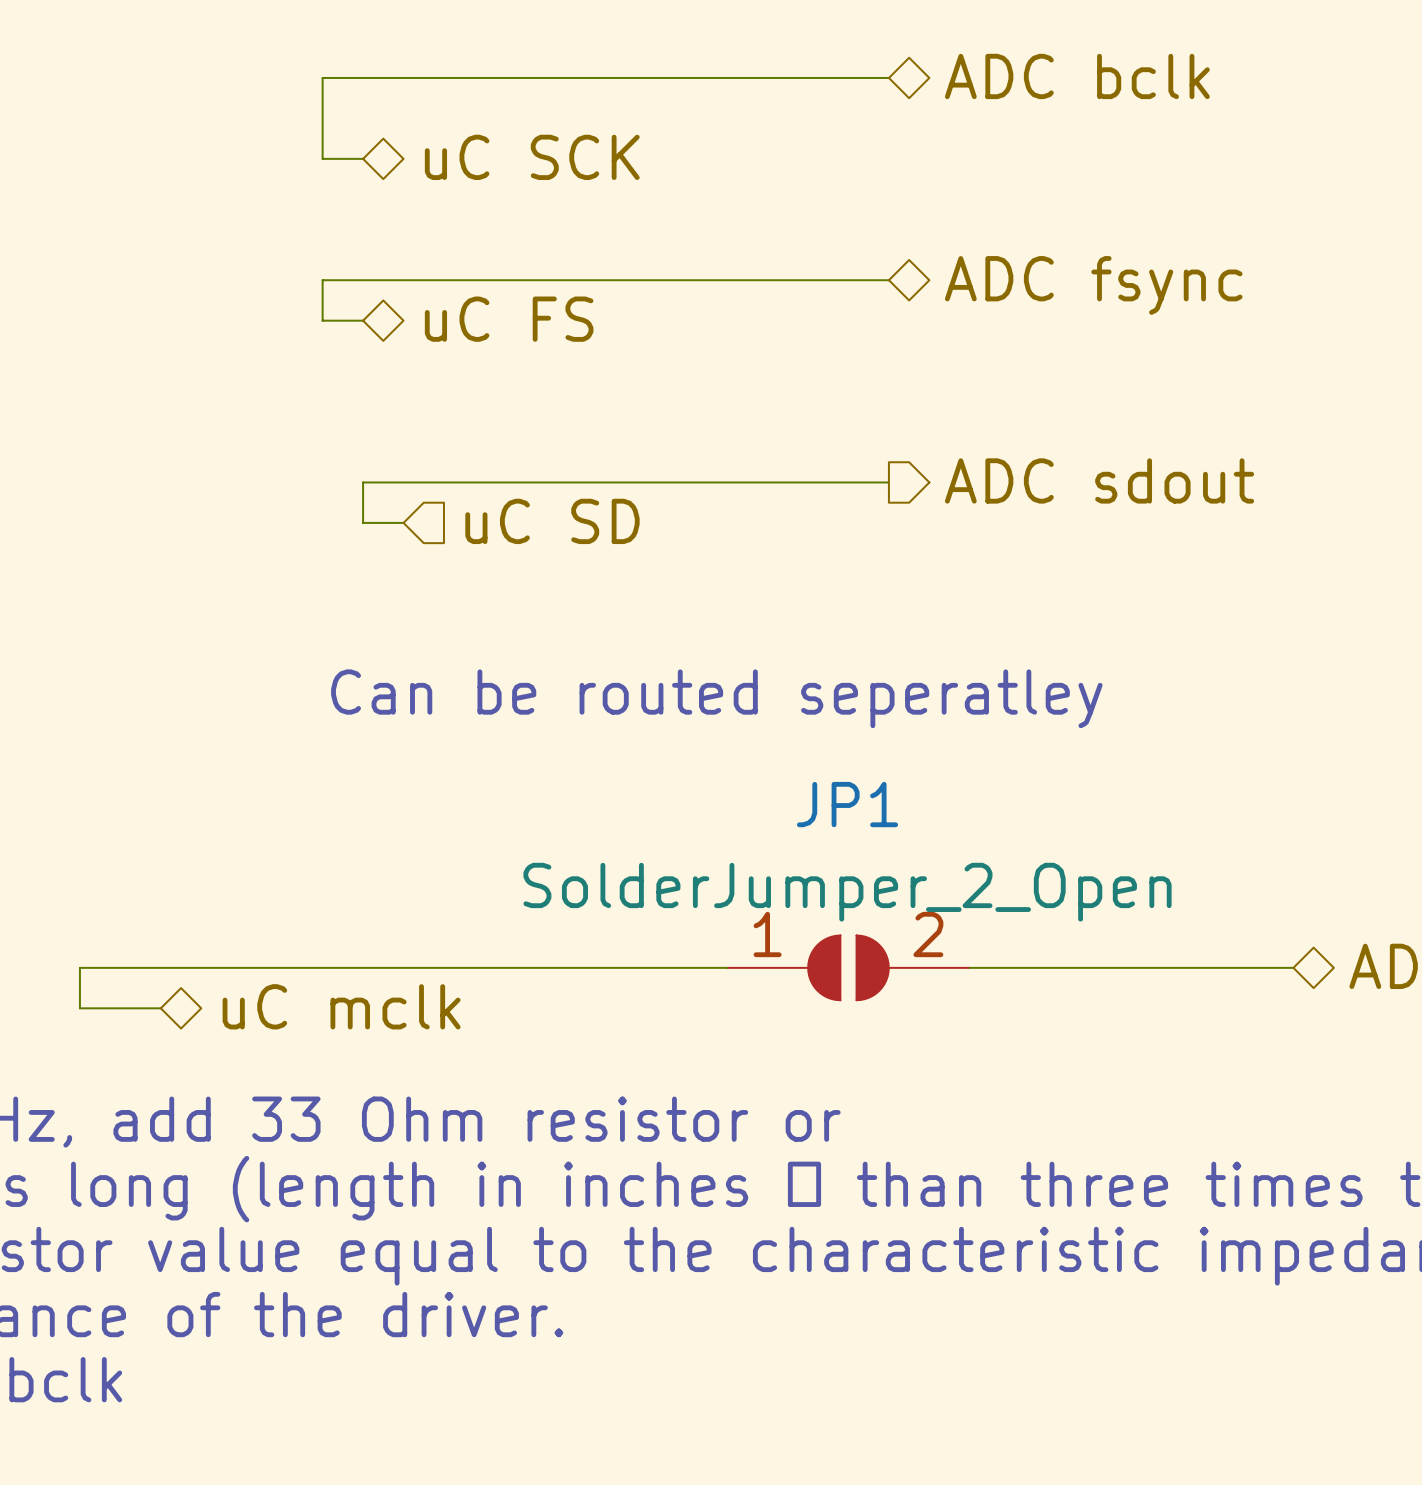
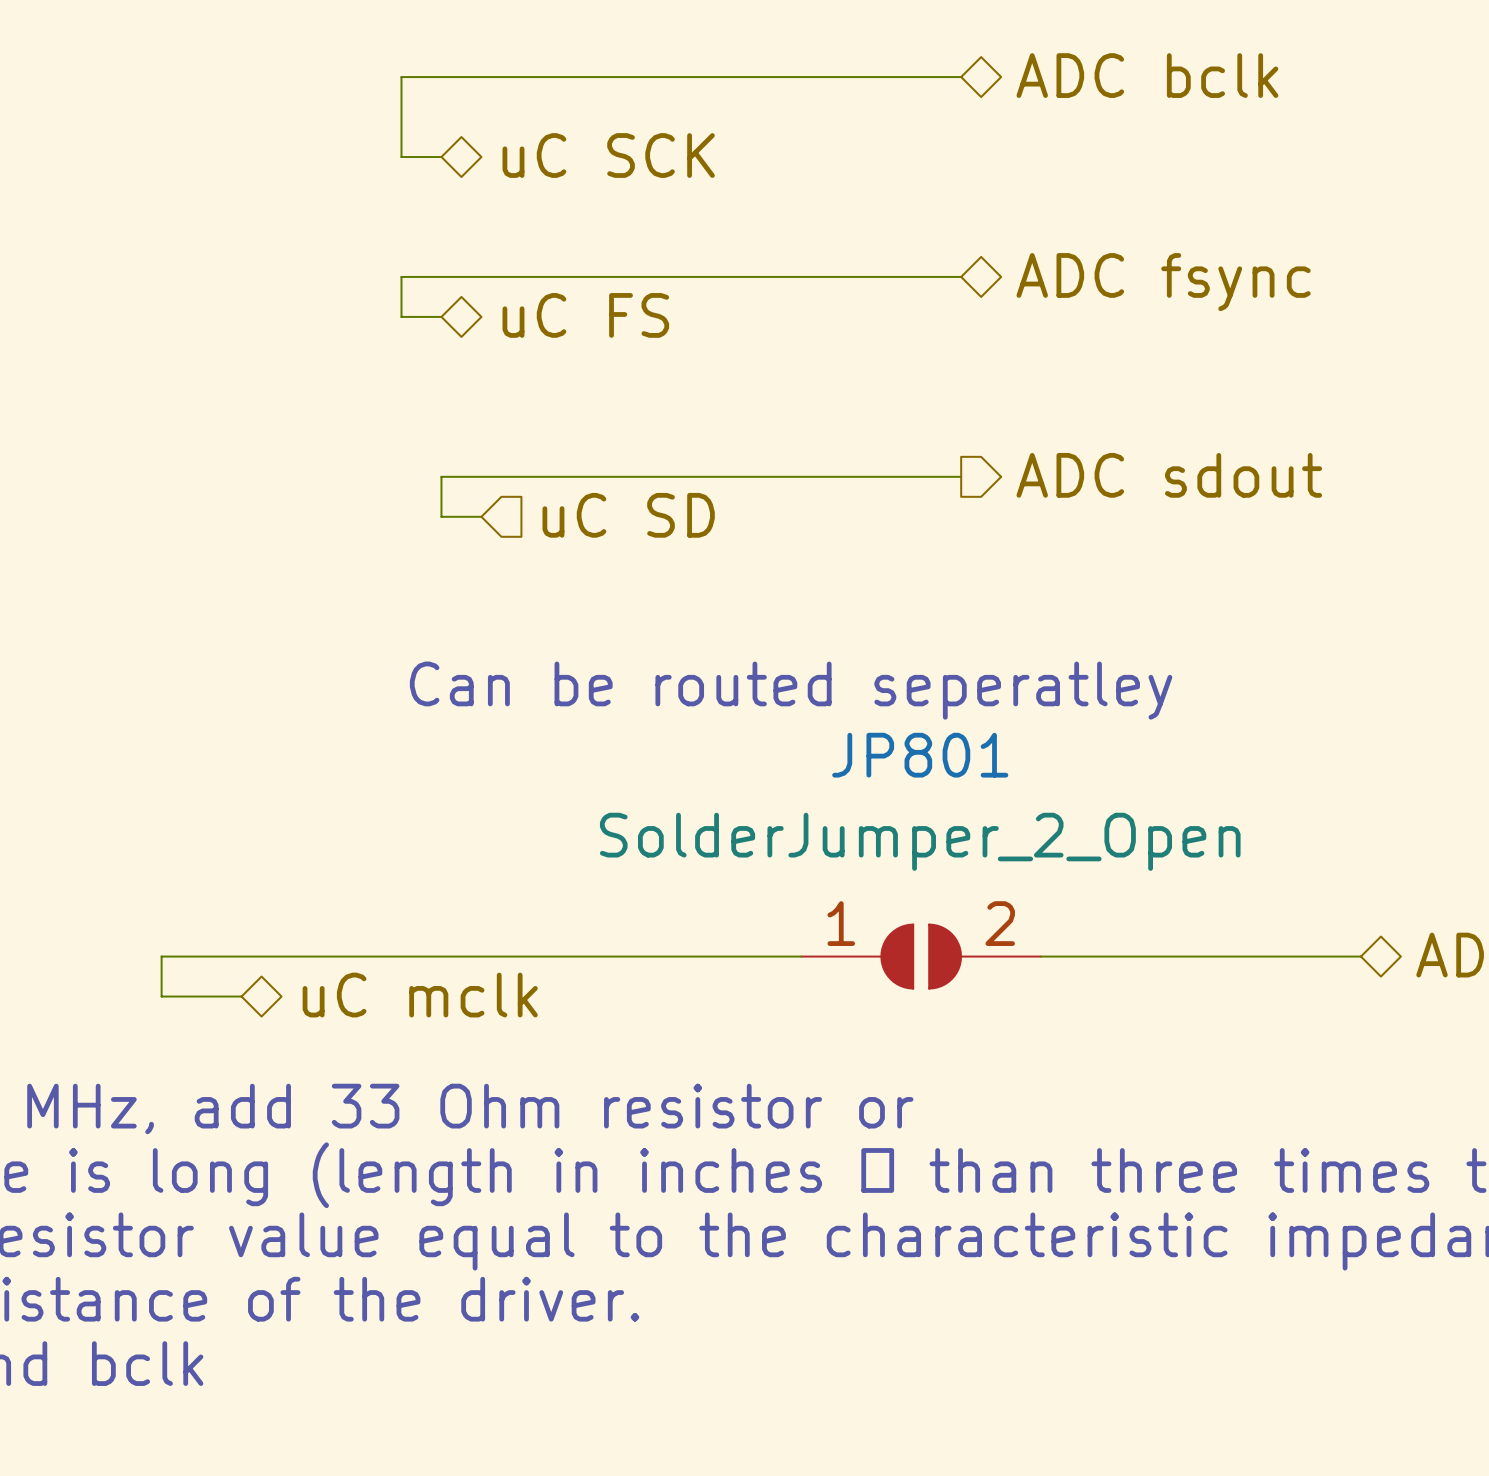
JP1 name: JP1 (847, 804) -> JP801 (920, 755)
JP1 value position: SolderJumper_2_Open (847, 892) -> SolderJumper_2_Open (920, 841)

